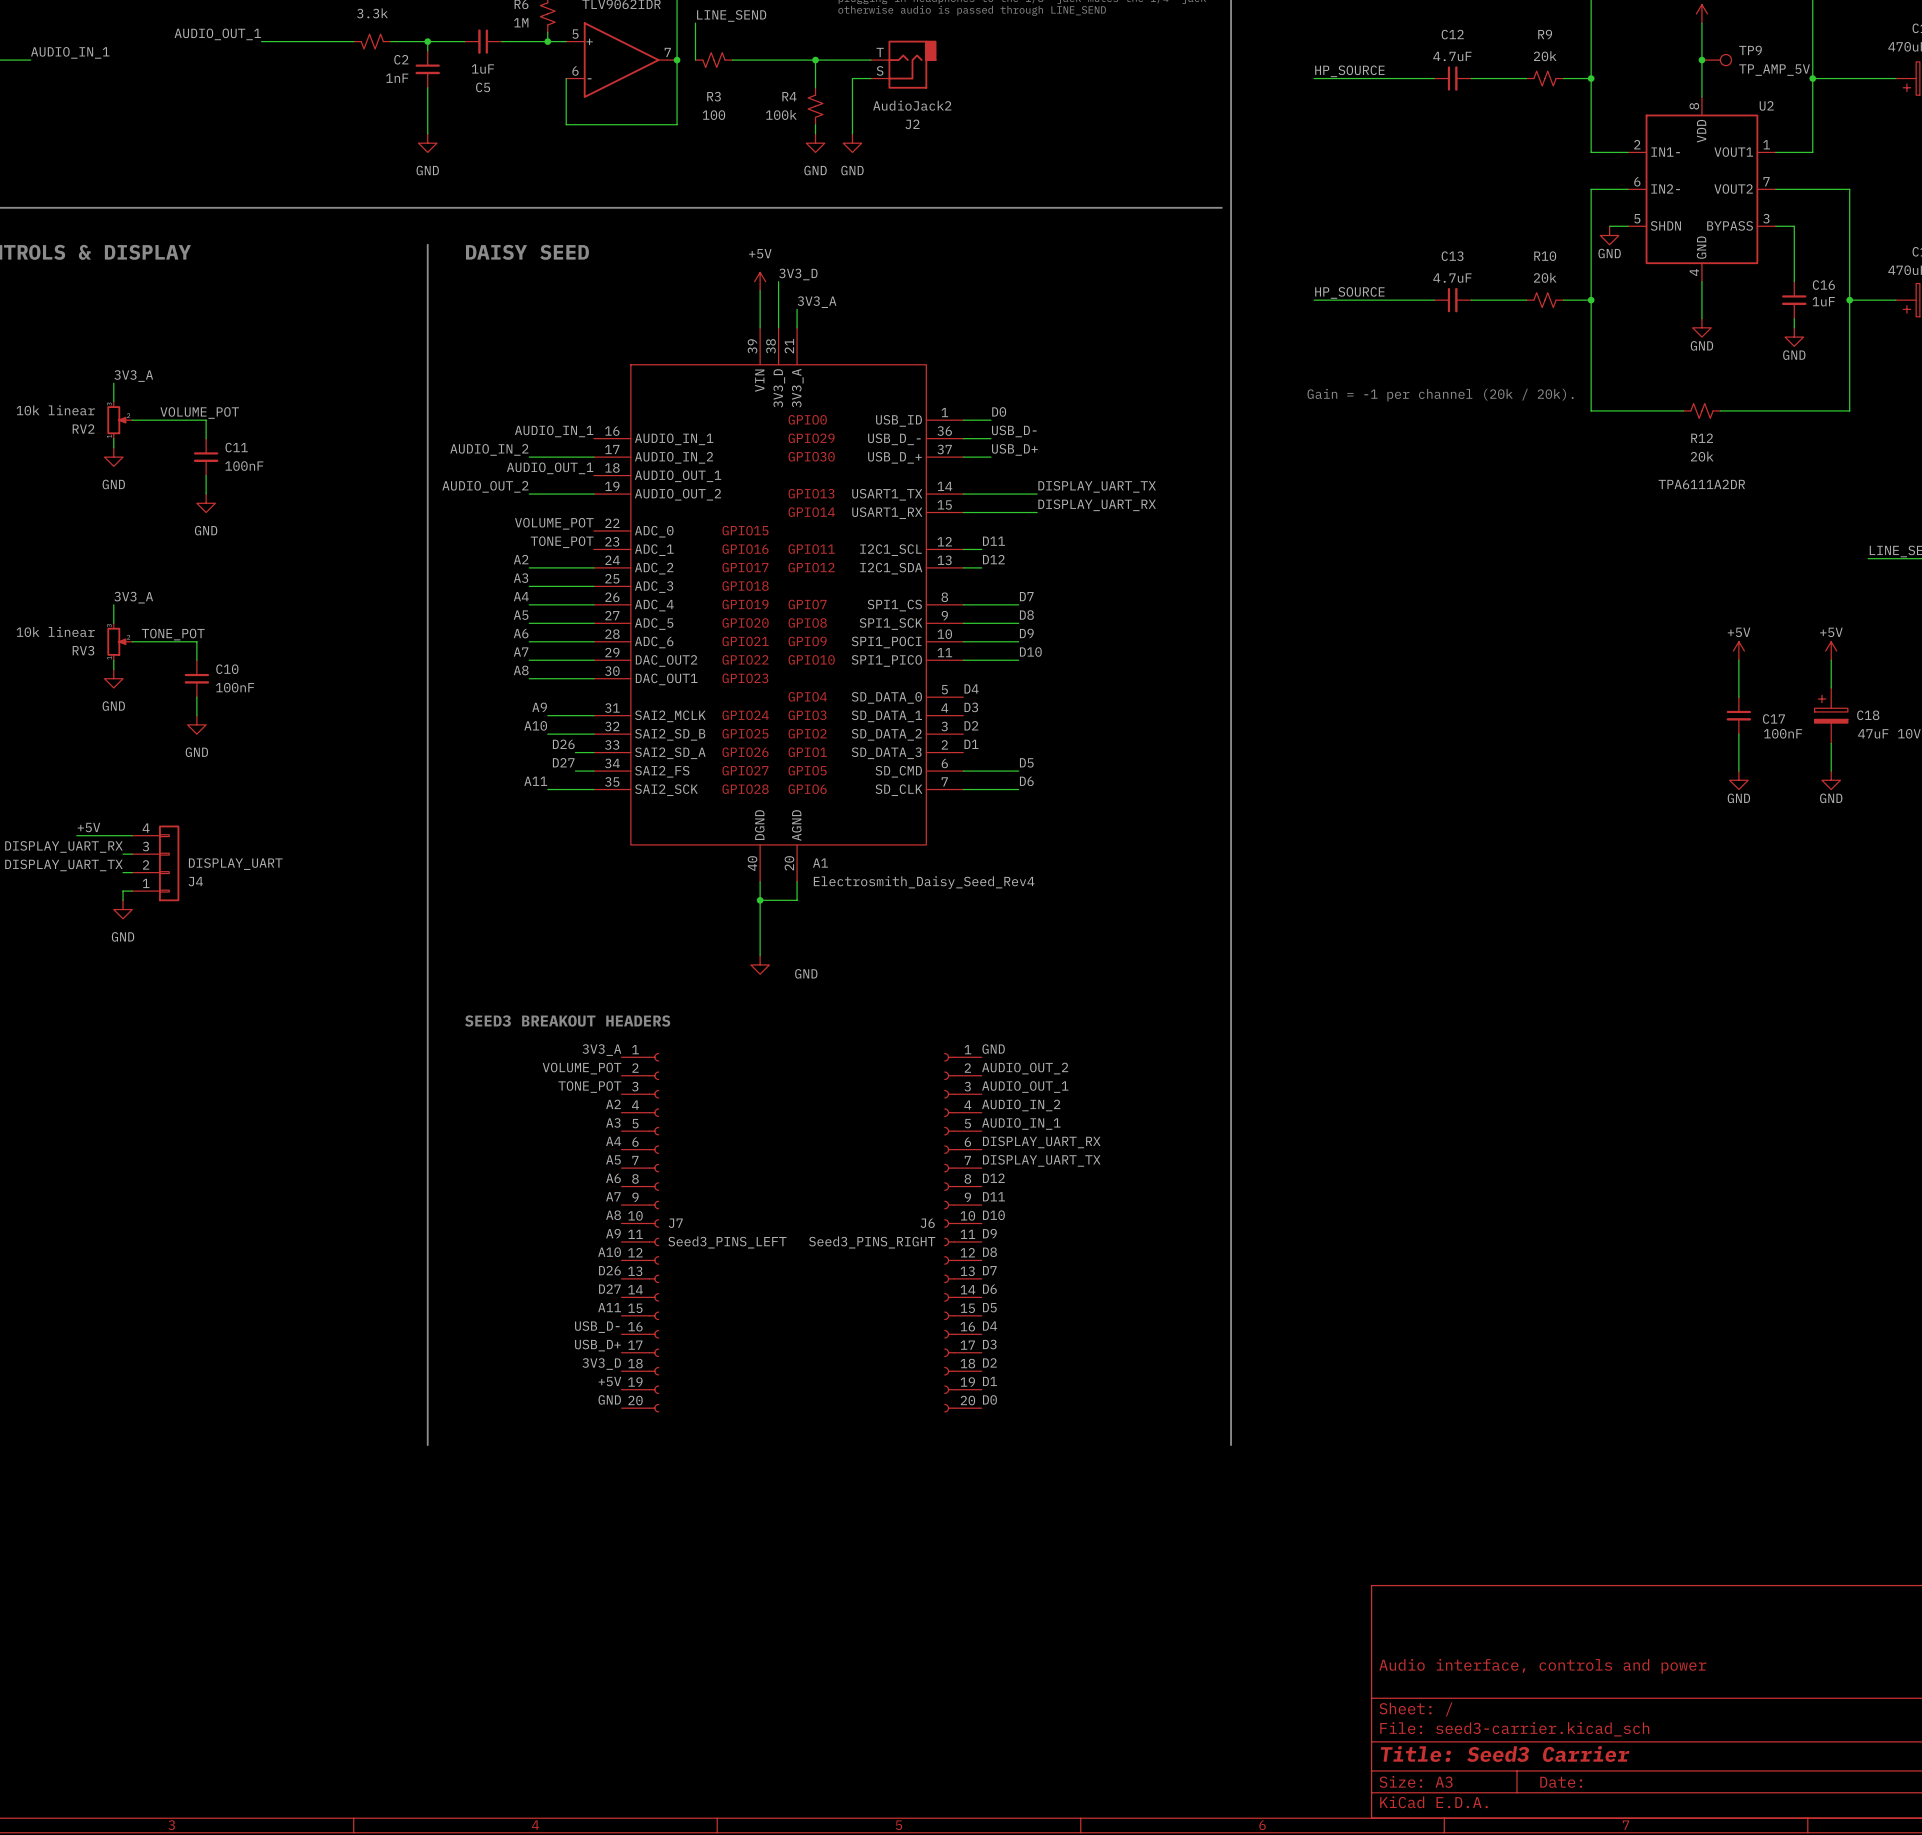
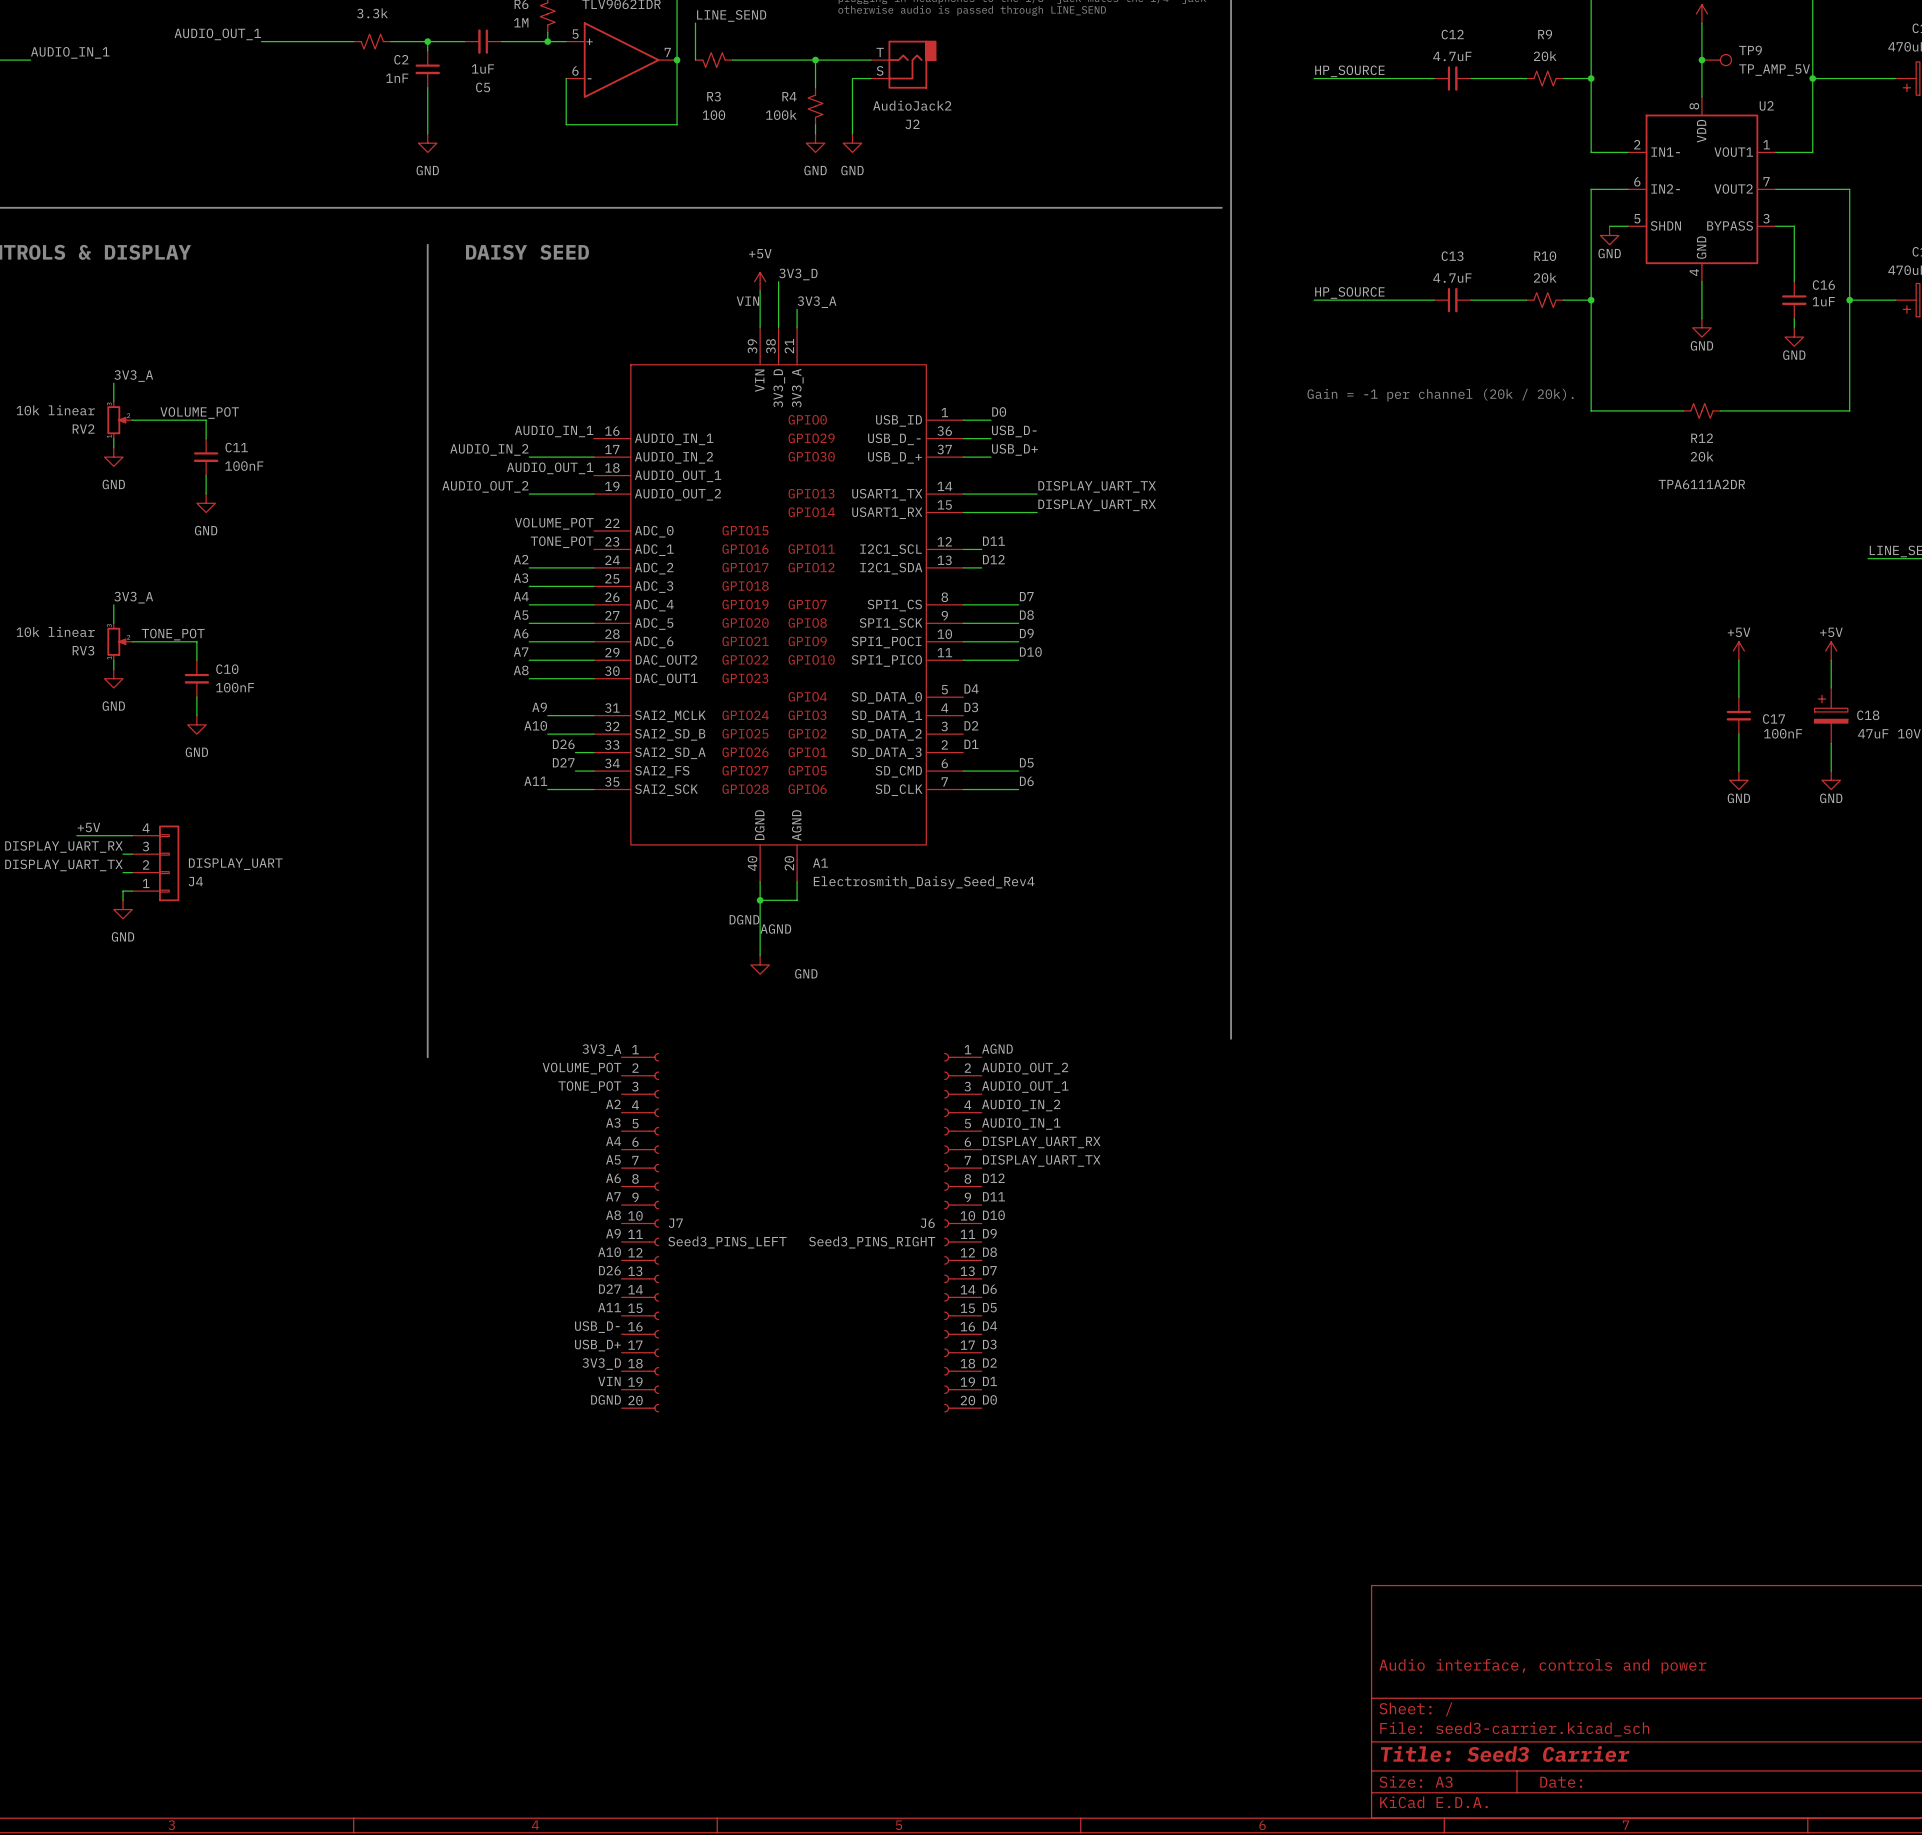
label: none -> VIN (747, 301)
label: none -> DGND (744, 919)
label: none -> AGND (775, 929)
text: SEED3 BREAKOUT HEADERS (567, 1020) -> none
line: (1231, 1038) (1231, 1445) -> none
label: GND (993, 1049) -> AGND (997, 1049)
line: (427, 1057) (427, 1445) -> none
label: +5V (609, 1381) -> VIN (609, 1381)
label: GND (609, 1399) -> DGND (606, 1399)

